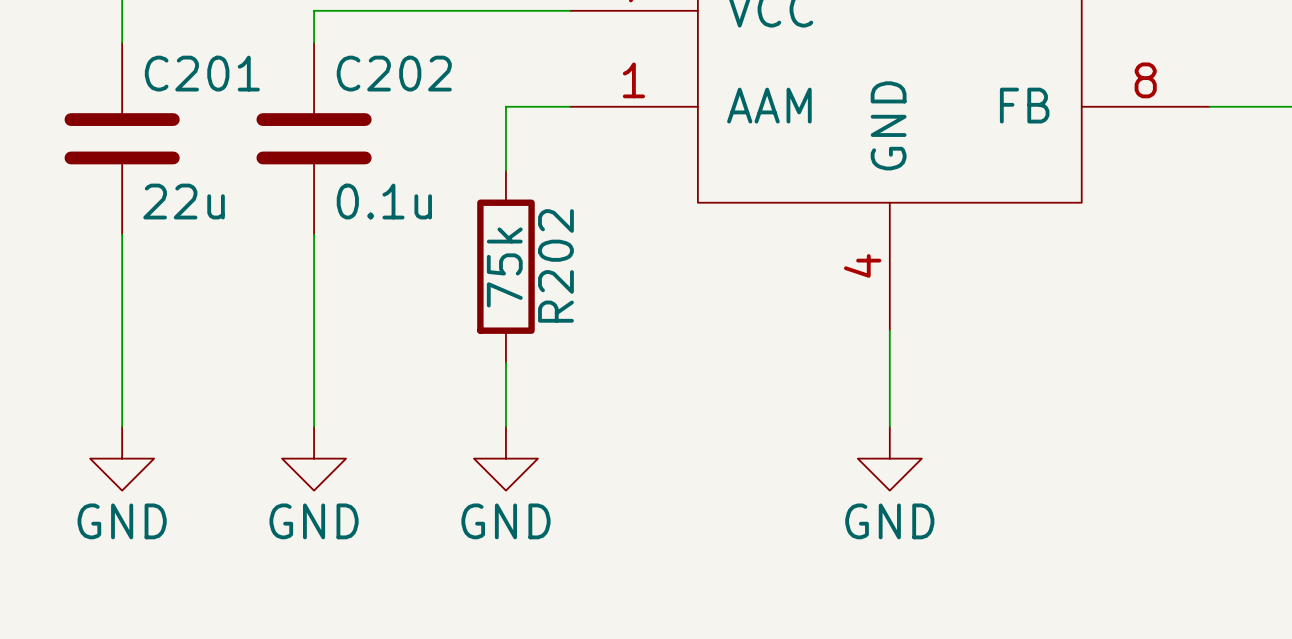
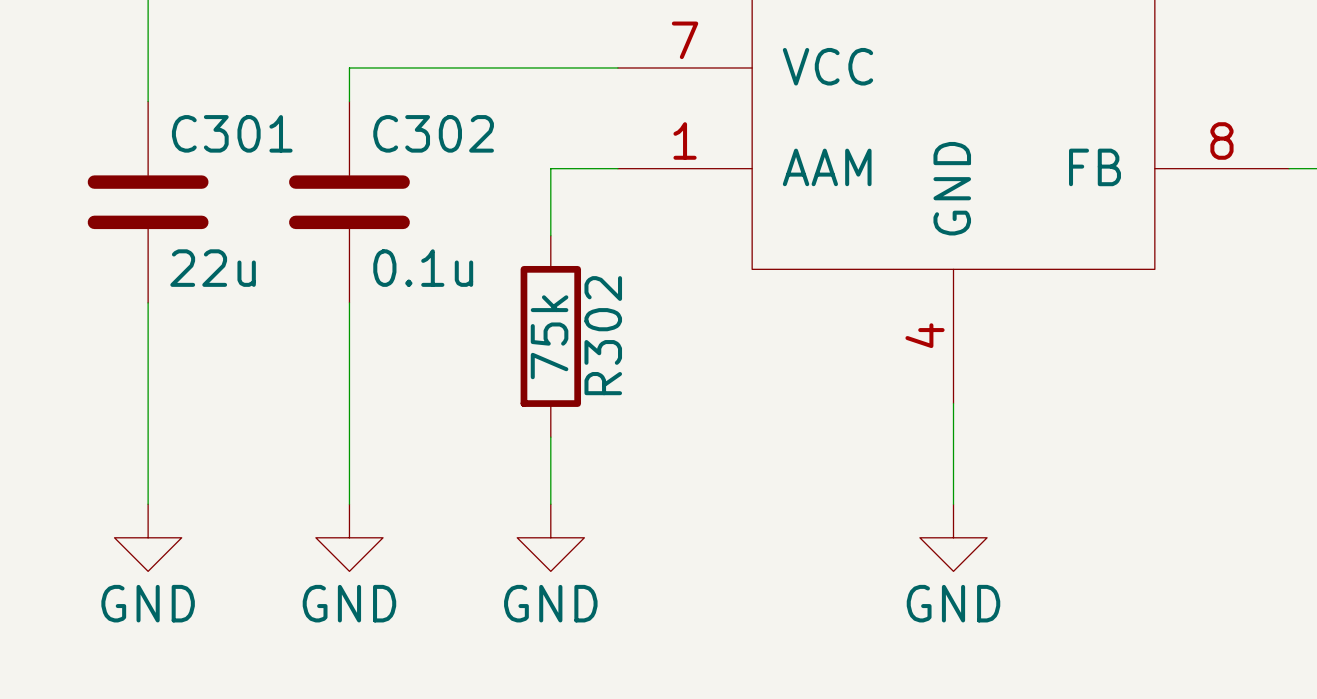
C201 name: C201 (202, 73) -> C301 (232, 133)
C202 name: C202 (394, 73) -> C302 (433, 133)
R202 name: R202 (555, 265) -> R302 (603, 335)

